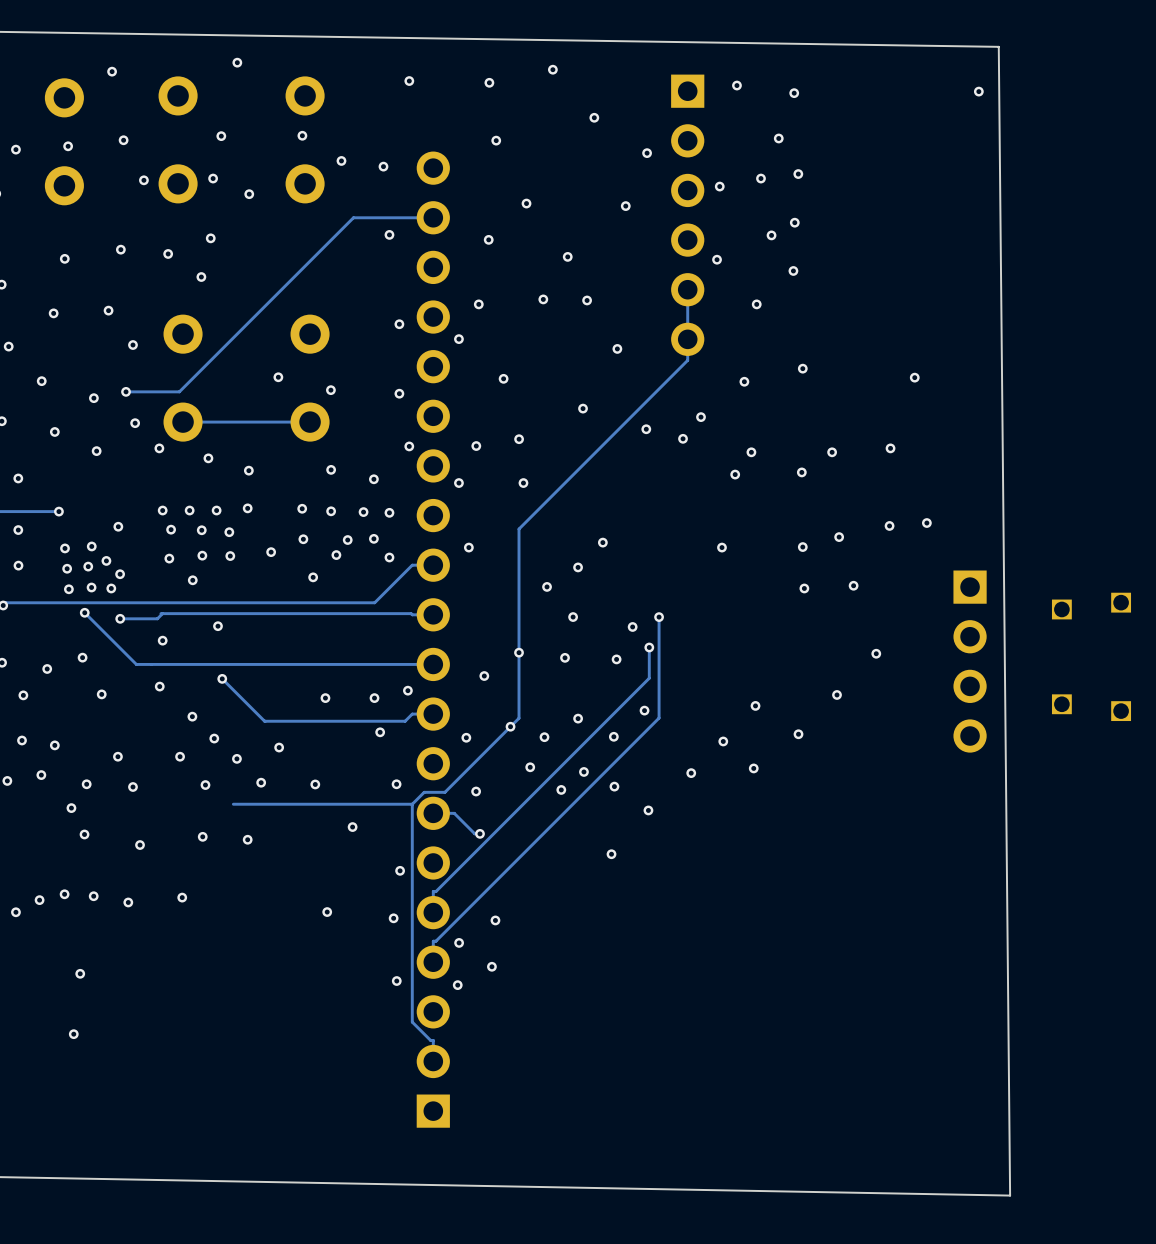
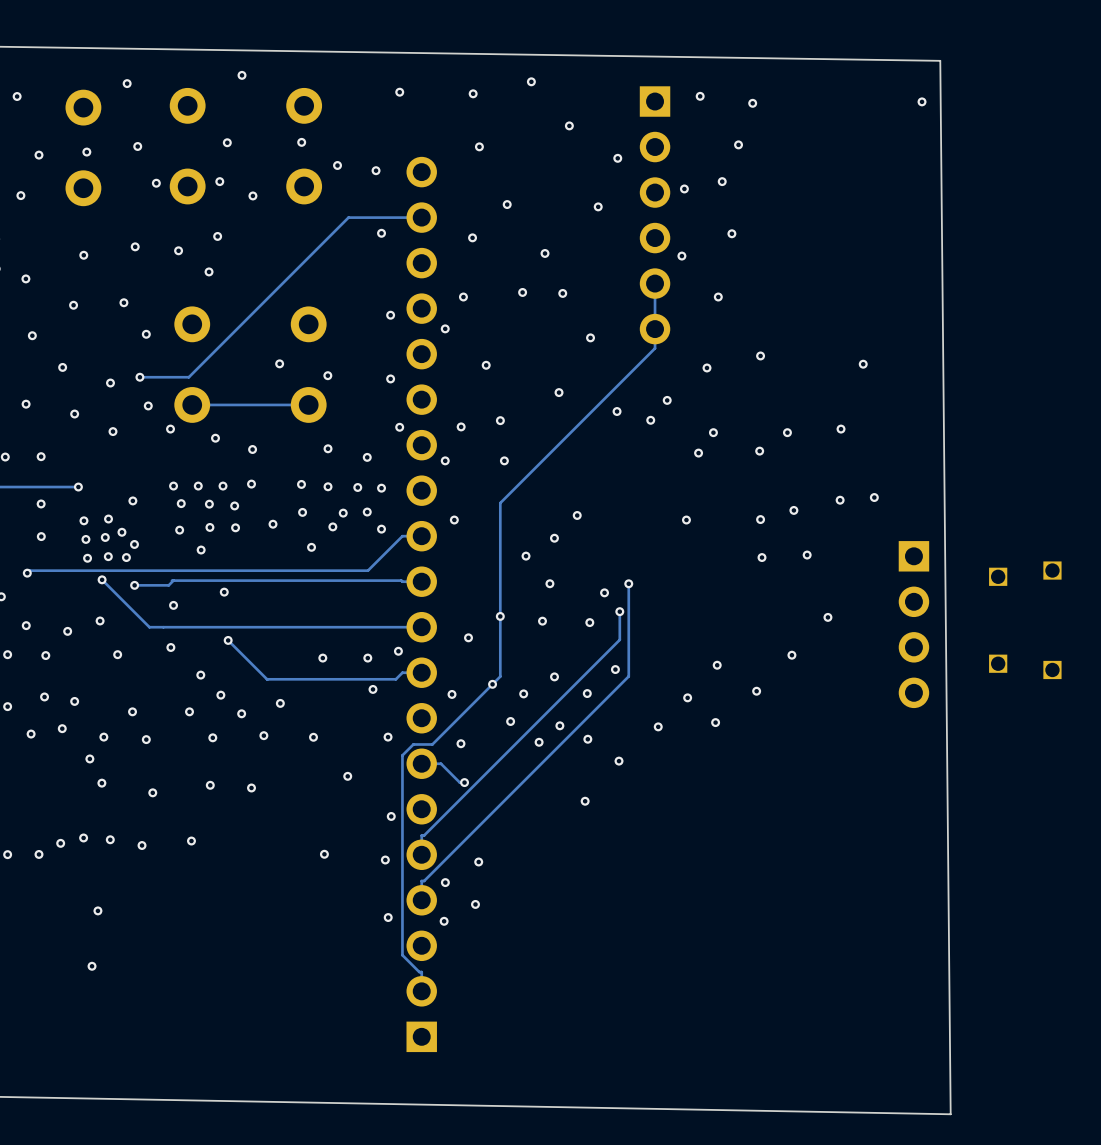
via: (798, 174) -> none
via: (794, 222) -> none
via: (793, 270) -> none
track: (412, 804) (233, 804) -> none

